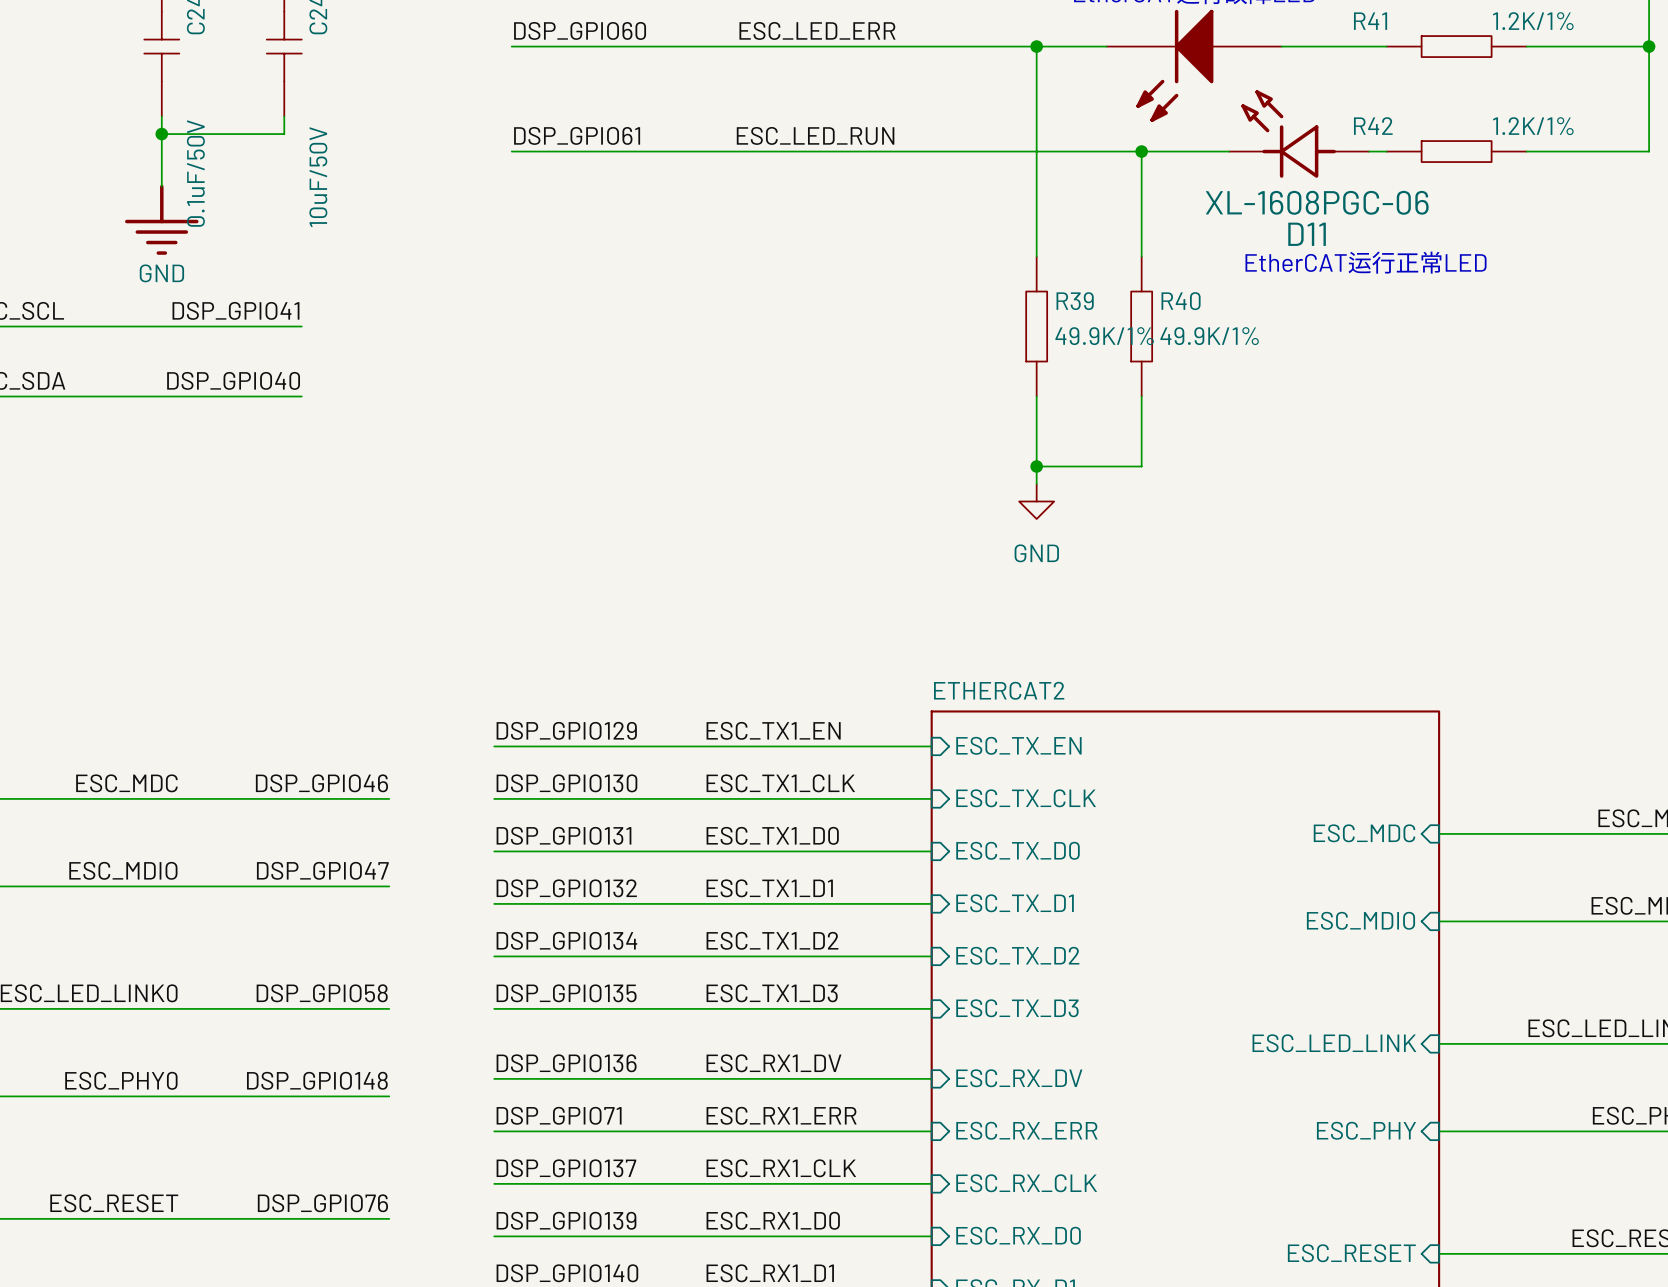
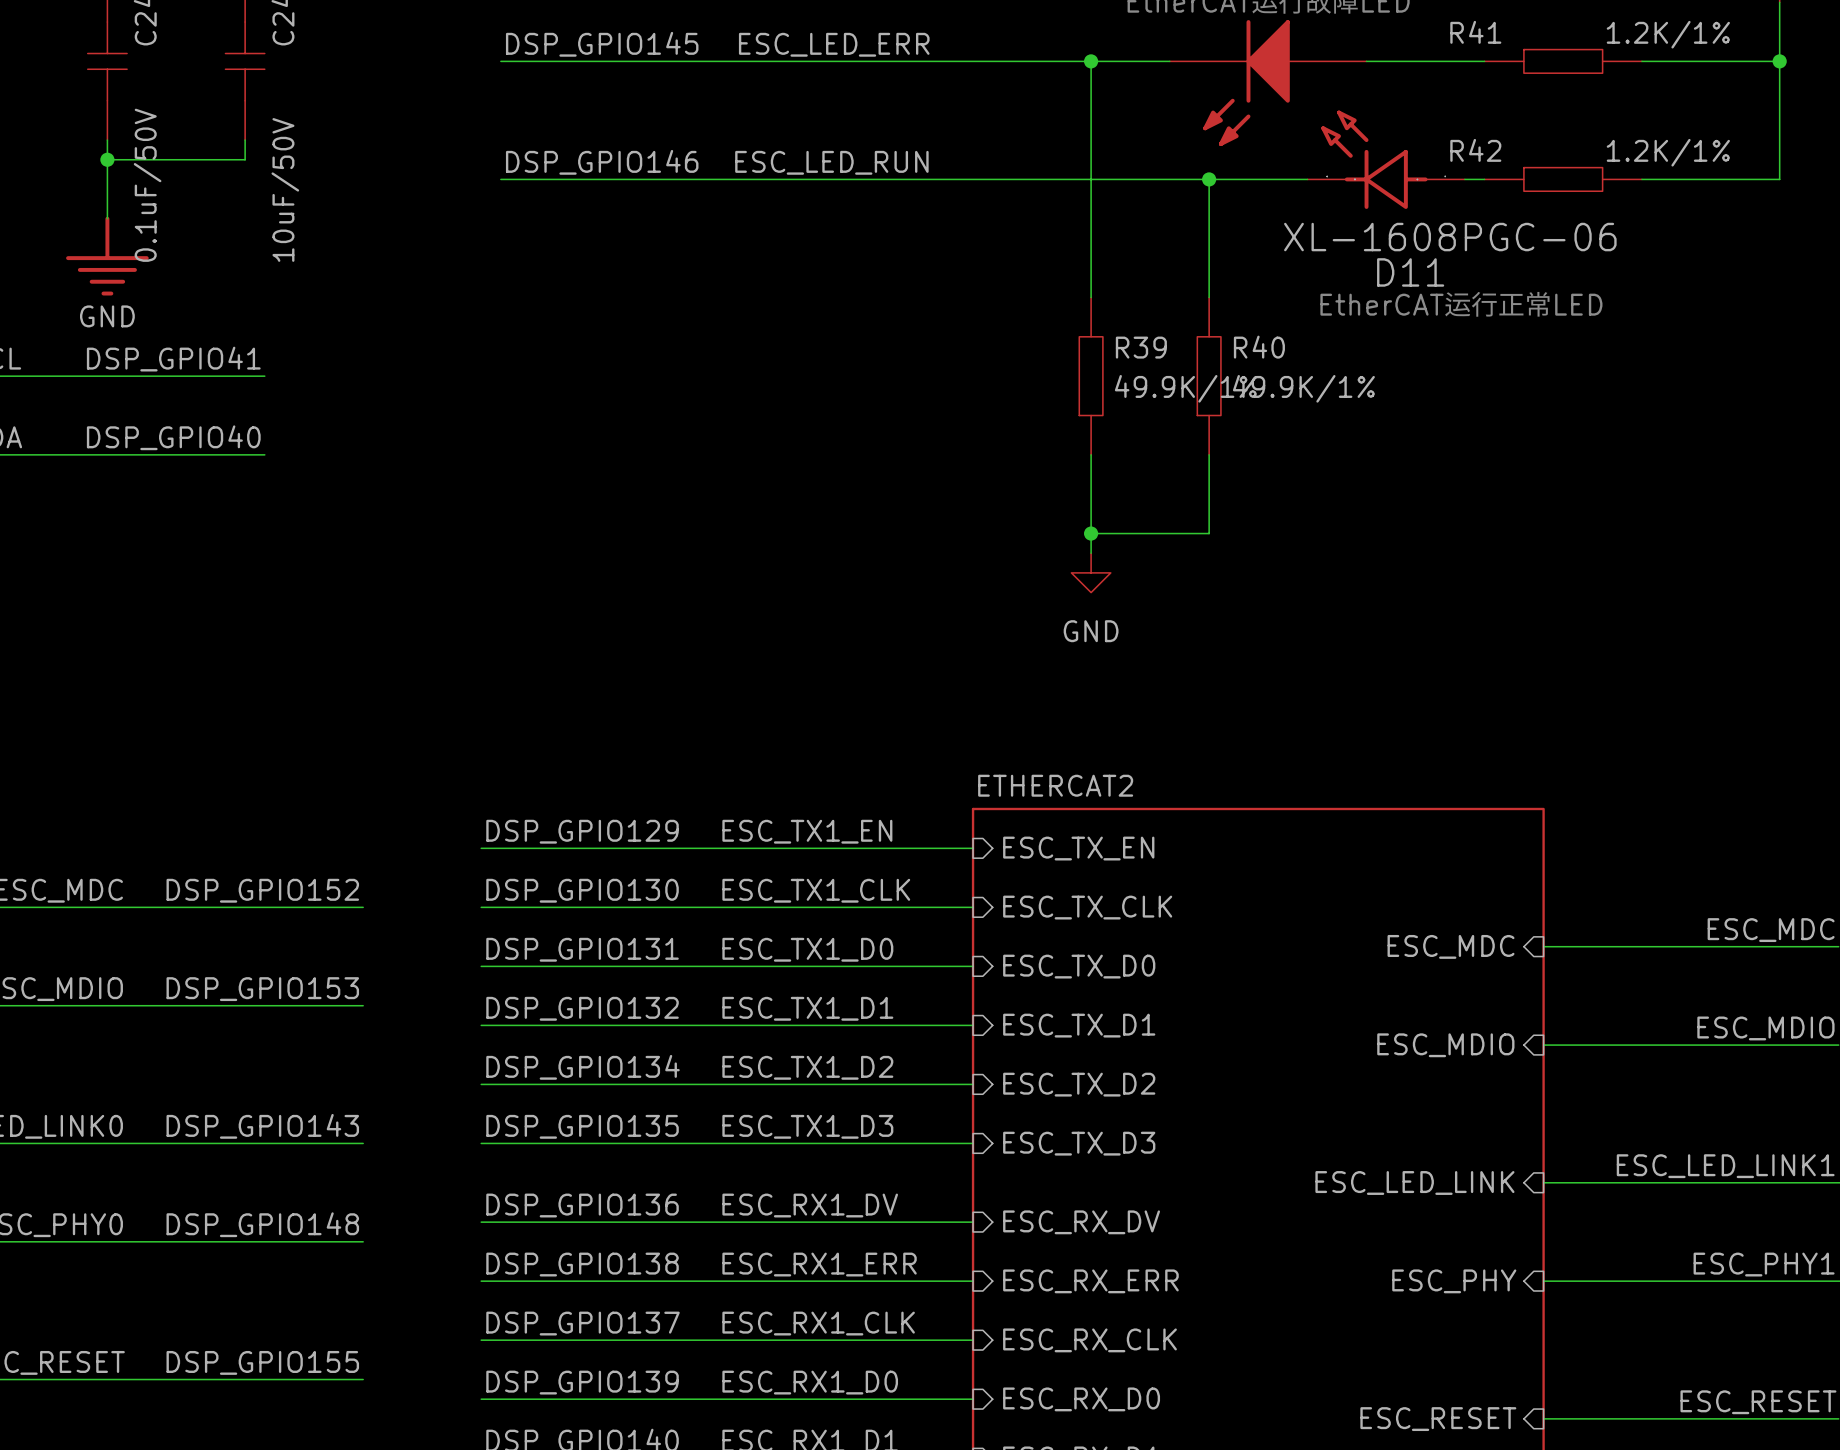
label: DSP_GPIO60 (580, 30) -> DSP_GPIO145 (602, 44)
label: DSP_GPIO61 (577, 135) -> DSP_GPIO146 (602, 162)
label: DSP_GPIO46 (321, 783) -> DSP_GPIO152 (262, 890)
label: DSP_GPIO47 (322, 870) -> DSP_GPIO153 (262, 989)
label: DSP_GPIO58 (322, 993) -> DSP_GPIO143 (262, 1126)
label: DSP_GPIO71 (559, 1115) -> DSP_GPIO138 (582, 1264)
label: DSP_GPIO76 (322, 1203) -> DSP_GPIO155 (262, 1362)

